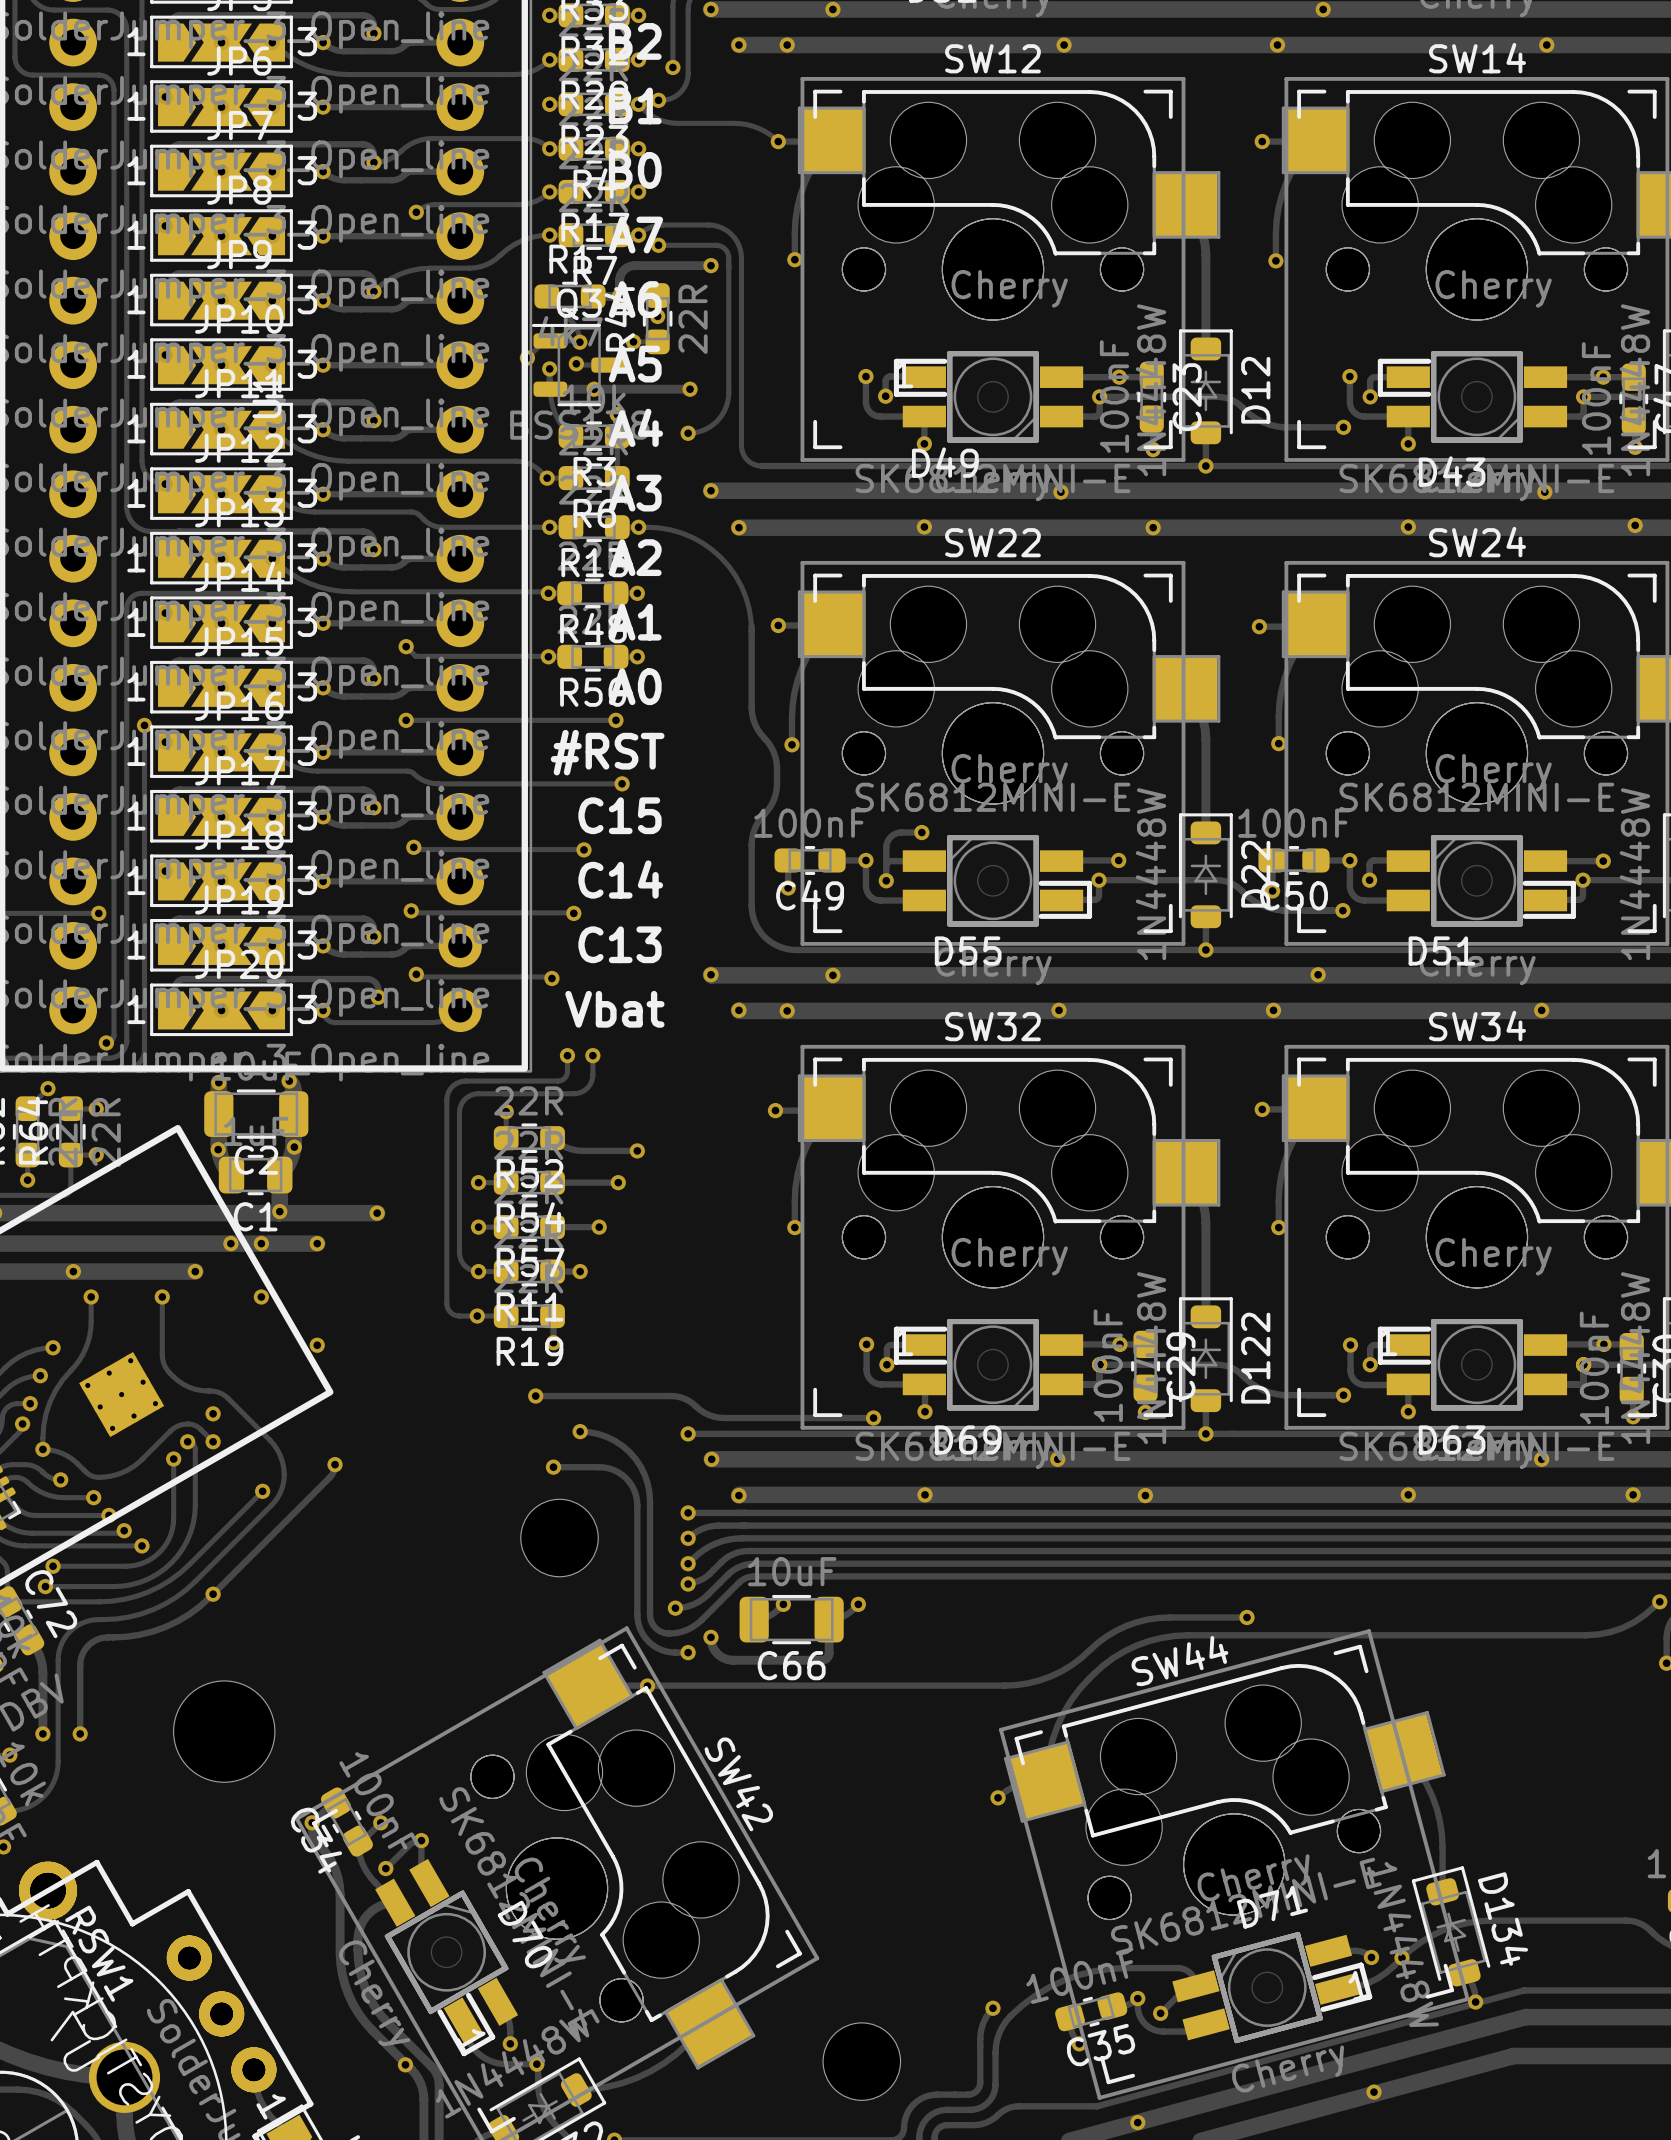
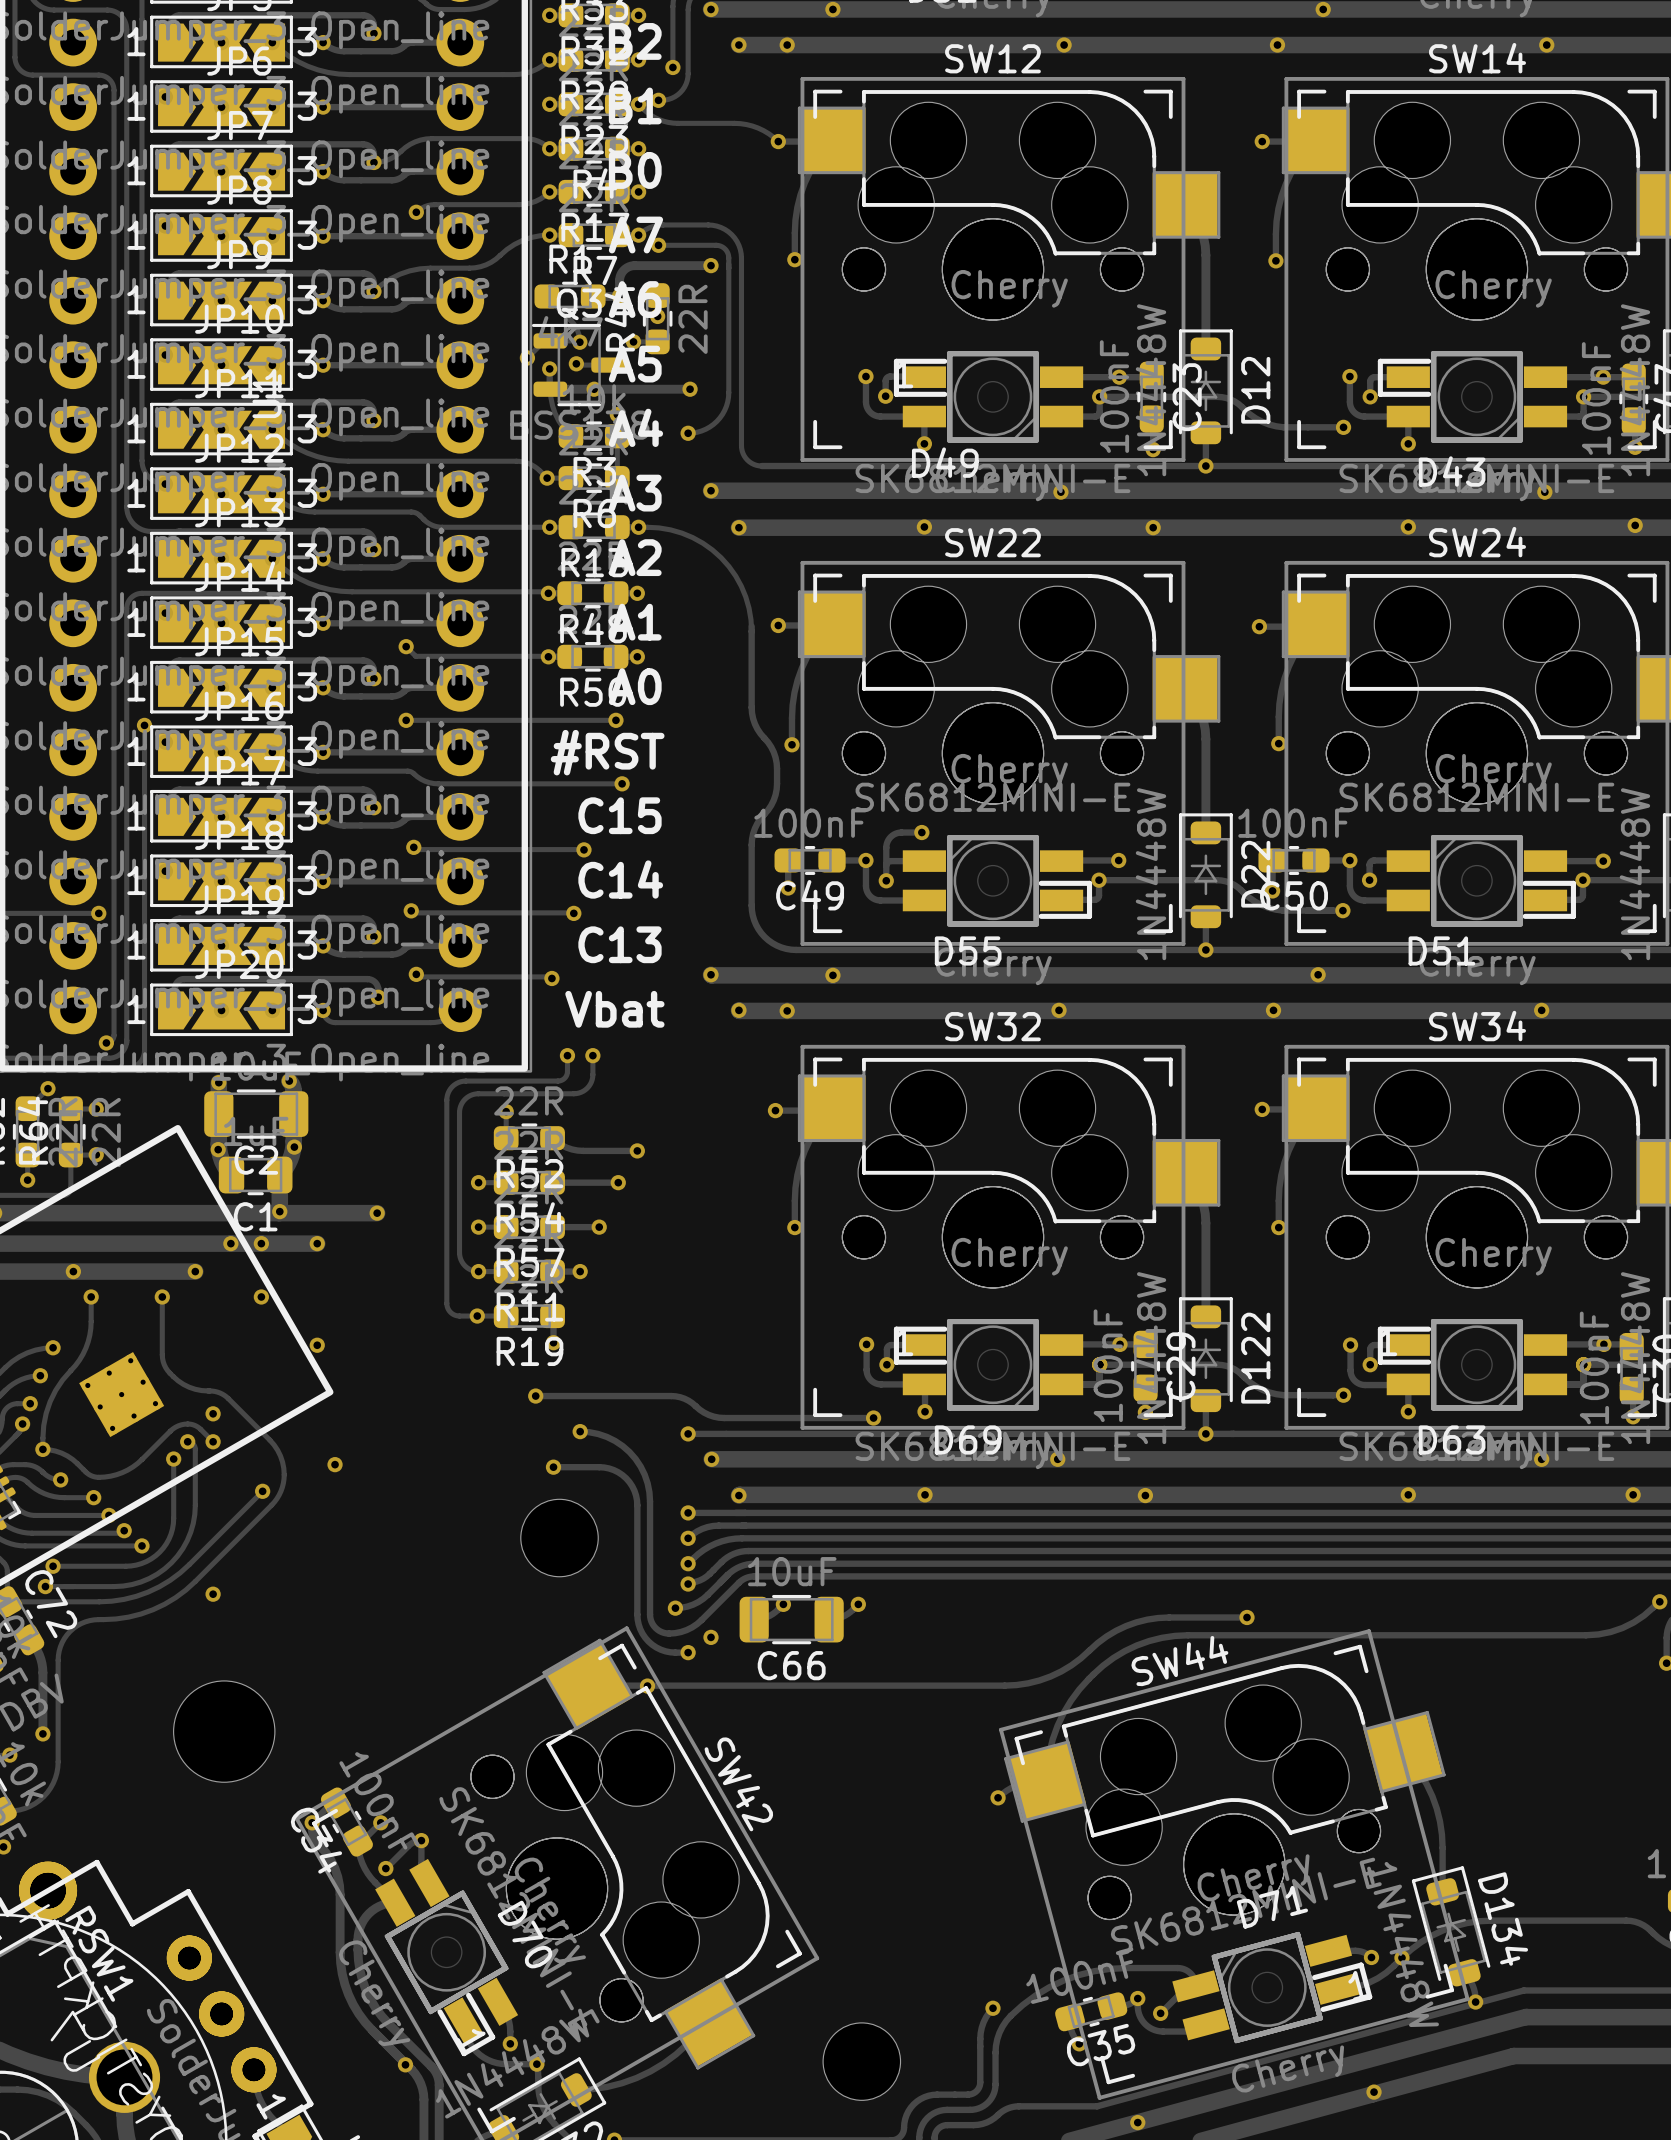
track: (335, 1464) (329, 1477) (210, 1597) (189, 1614) (152, 1631) (126, 1636) (100, 1638) (88, 1645) (80, 1661) (80, 1733) -> none
track: (829, 1619) (829, 1653) (827, 1658) (822, 1660) (727, 1659) (715, 1651) (711, 1637) -> none
via: (80, 1733) -> none

